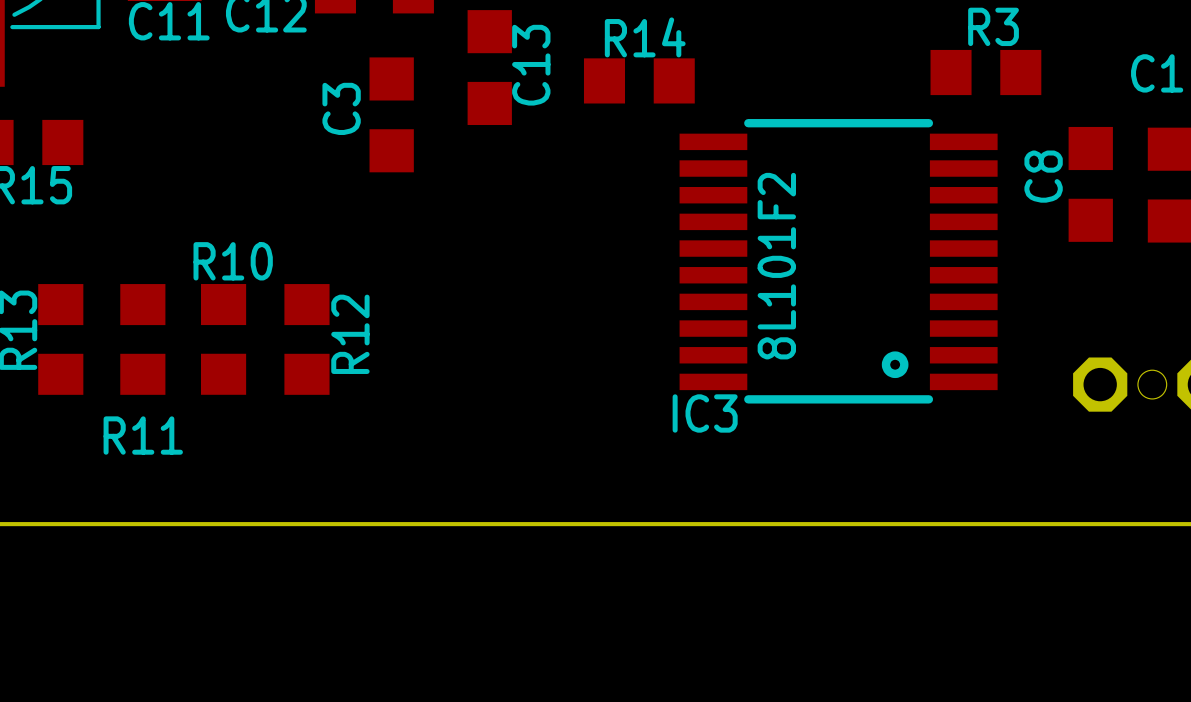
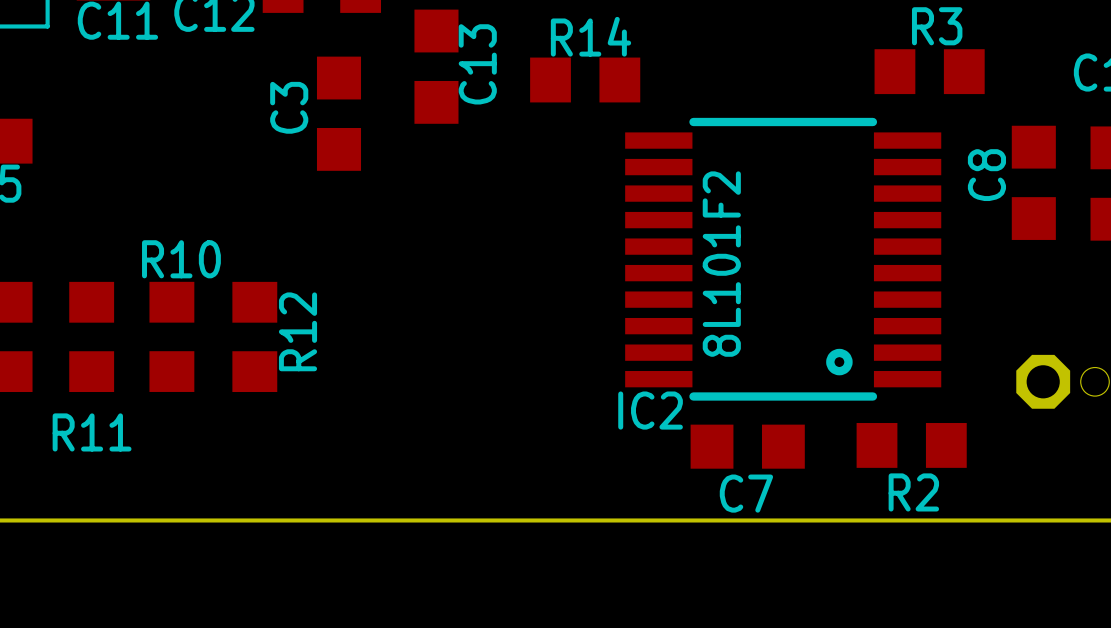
IC3 name: IC3 (705, 413) -> IC2 (650, 410)
R2: none -> (911, 445)
C7: none -> (747, 446)

